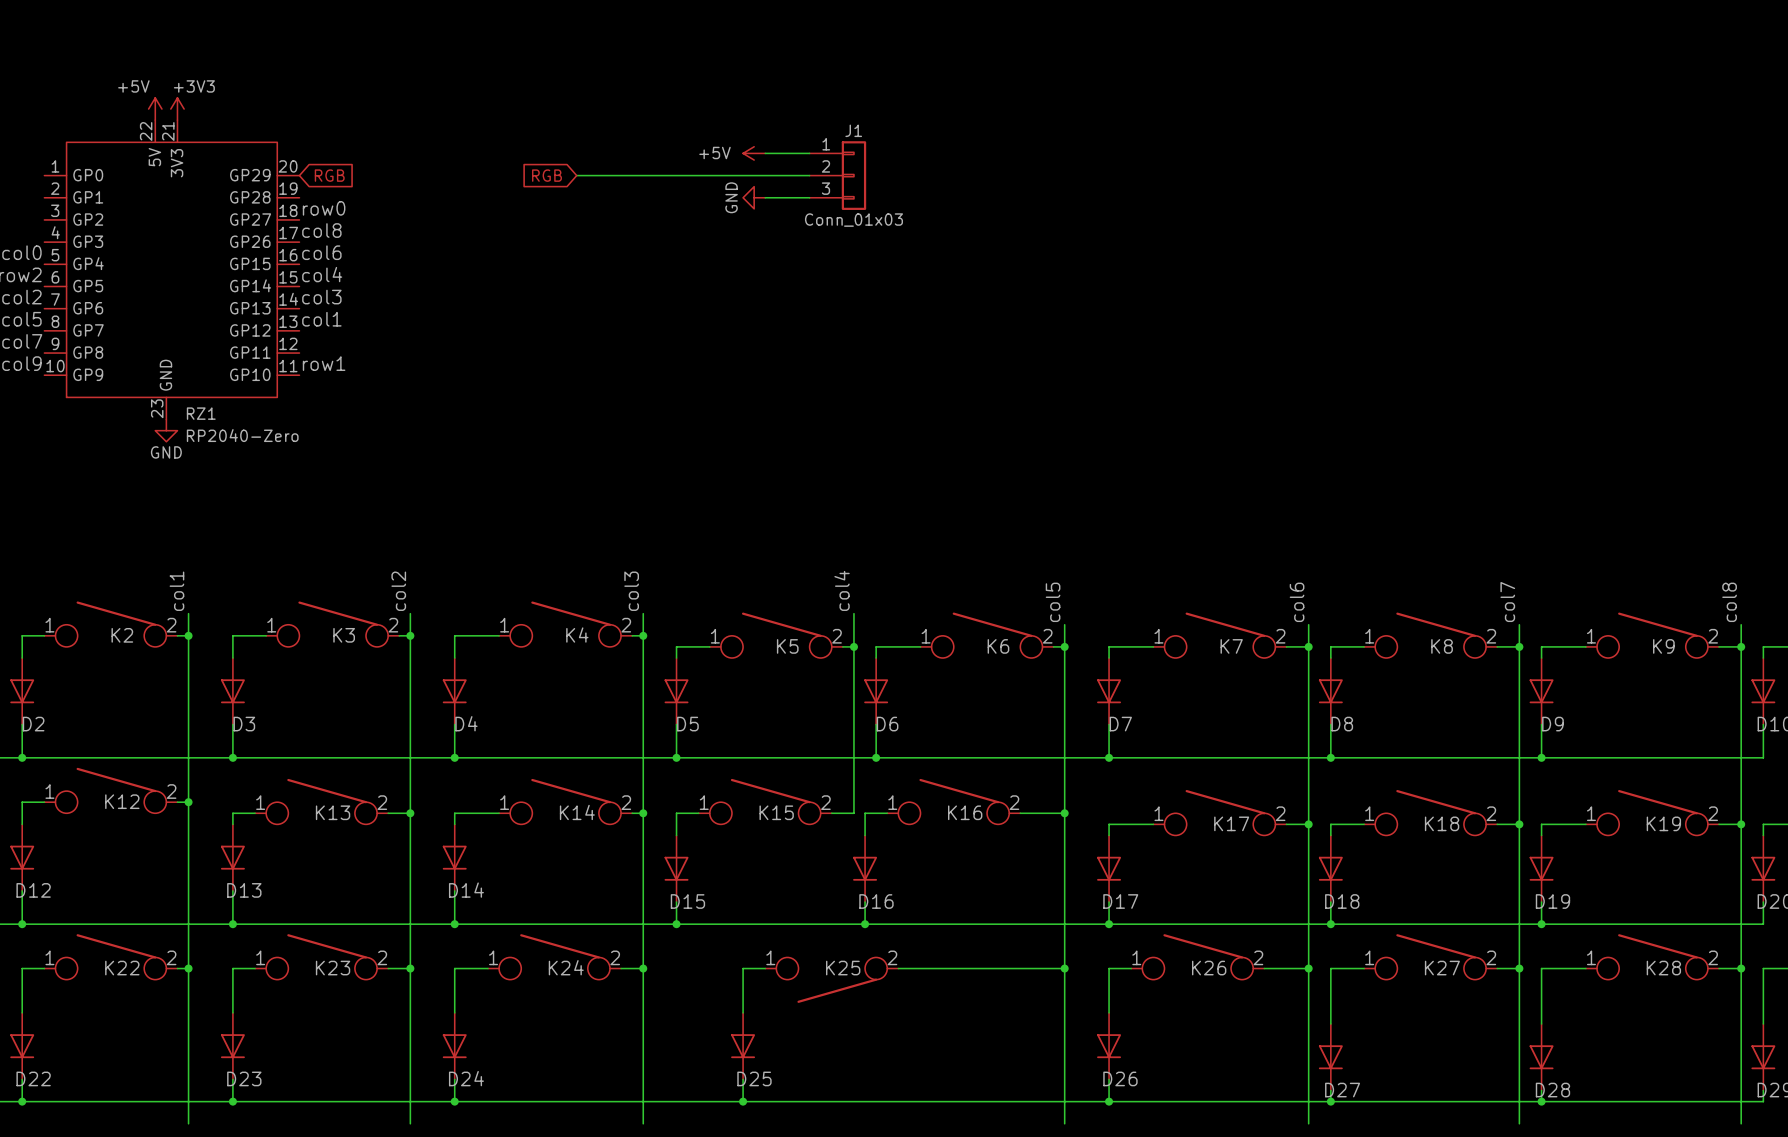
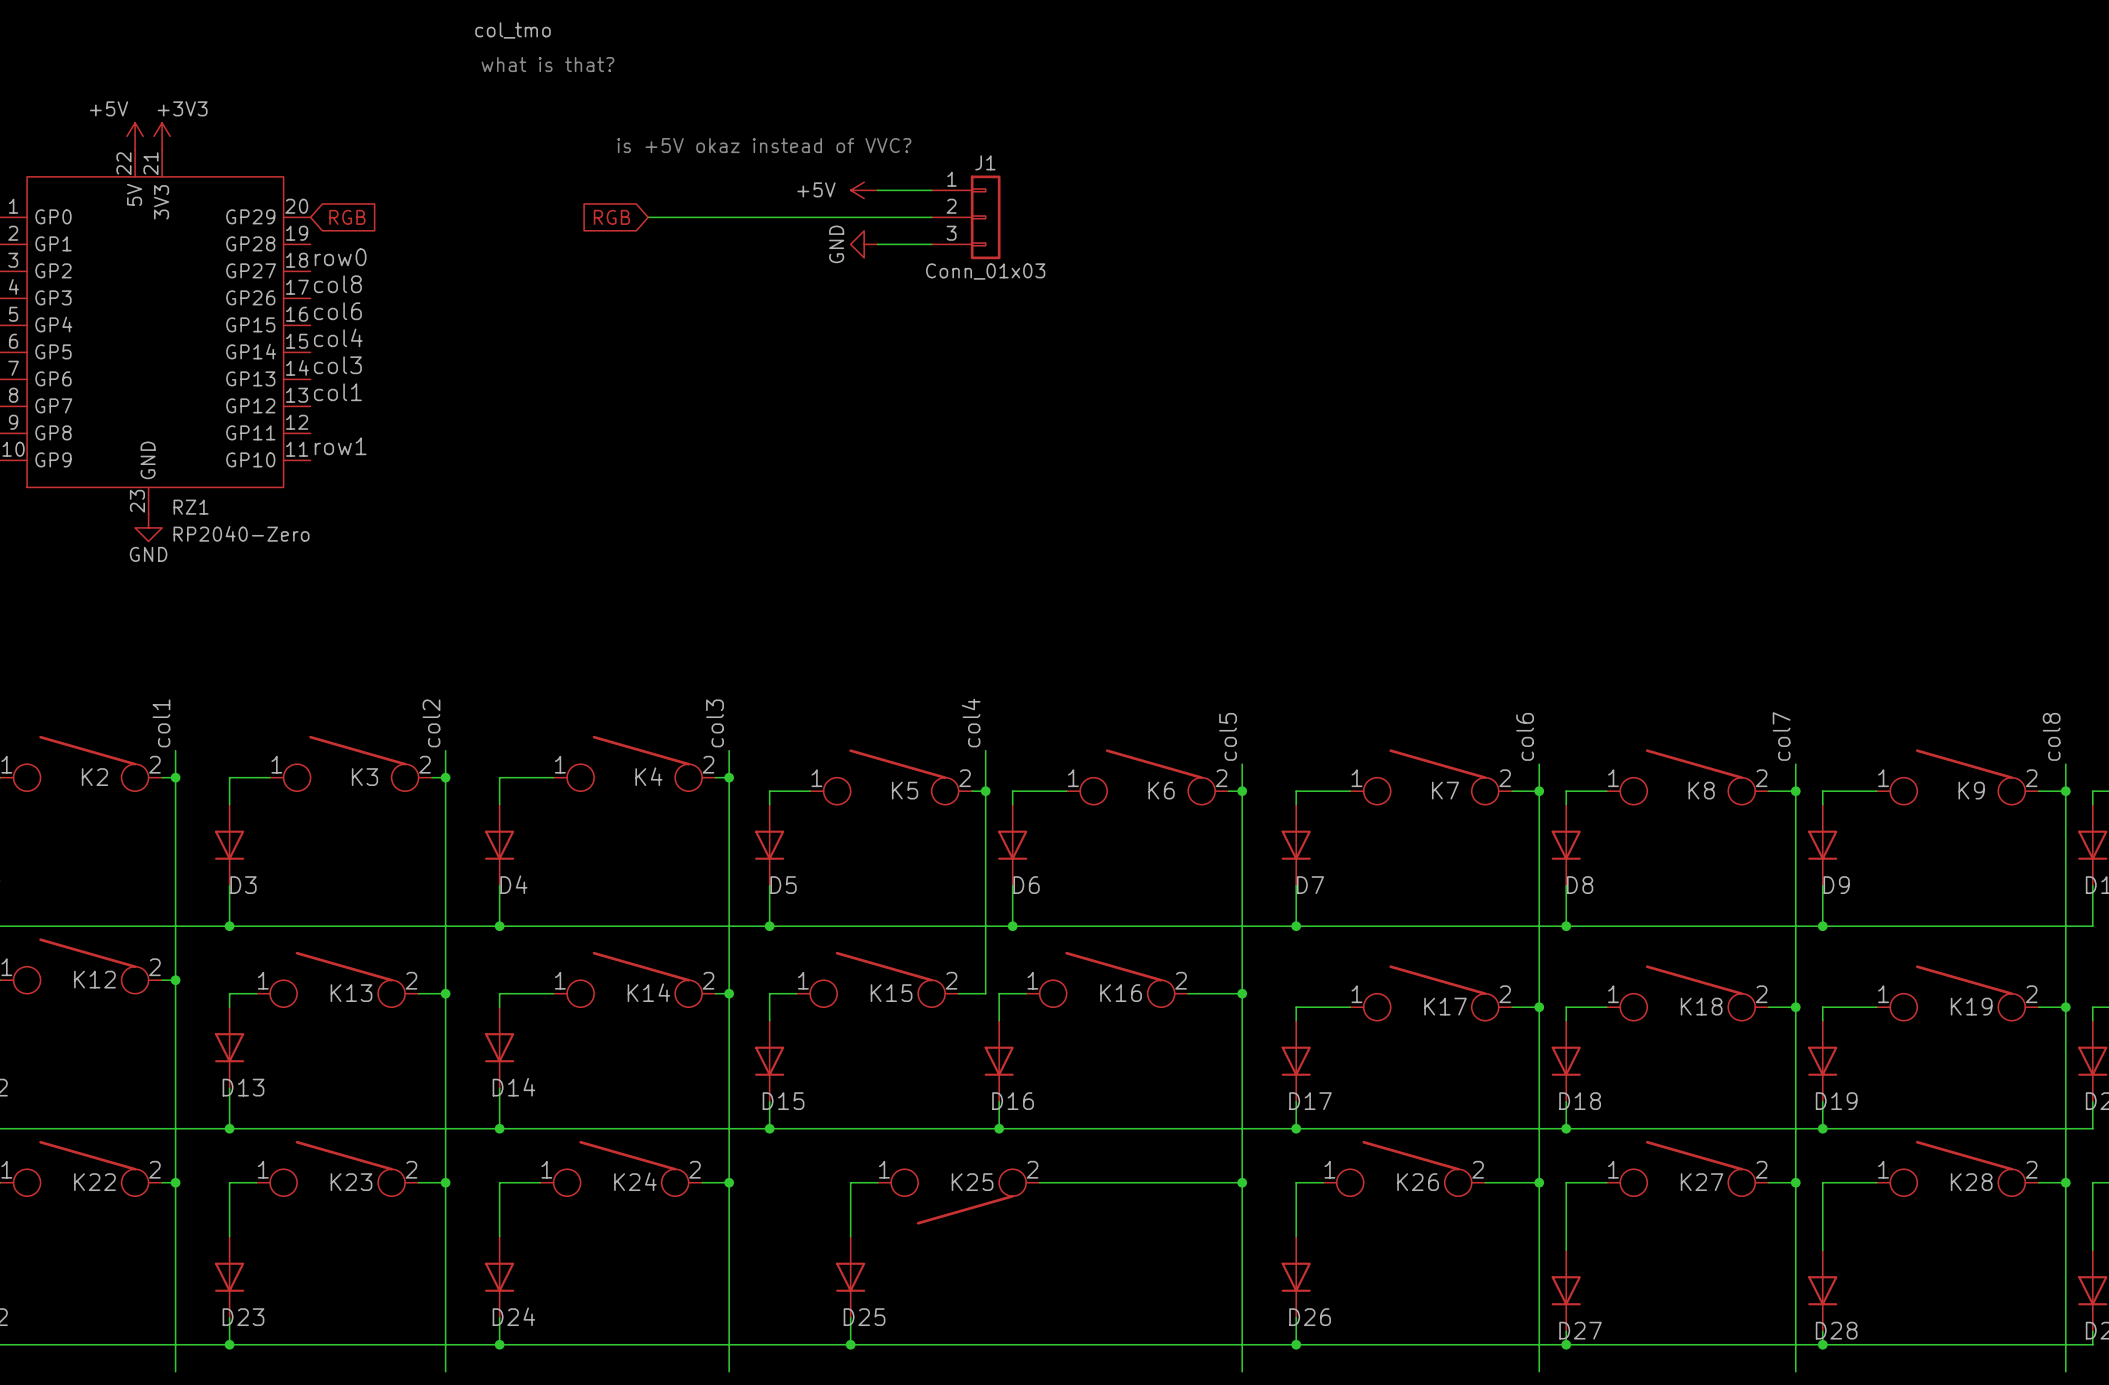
label: none -> col_tmo (513, 30)
text: none -> what is that? (547, 64)
text: none -> is +5V okaz instead of VVC? (764, 145)

